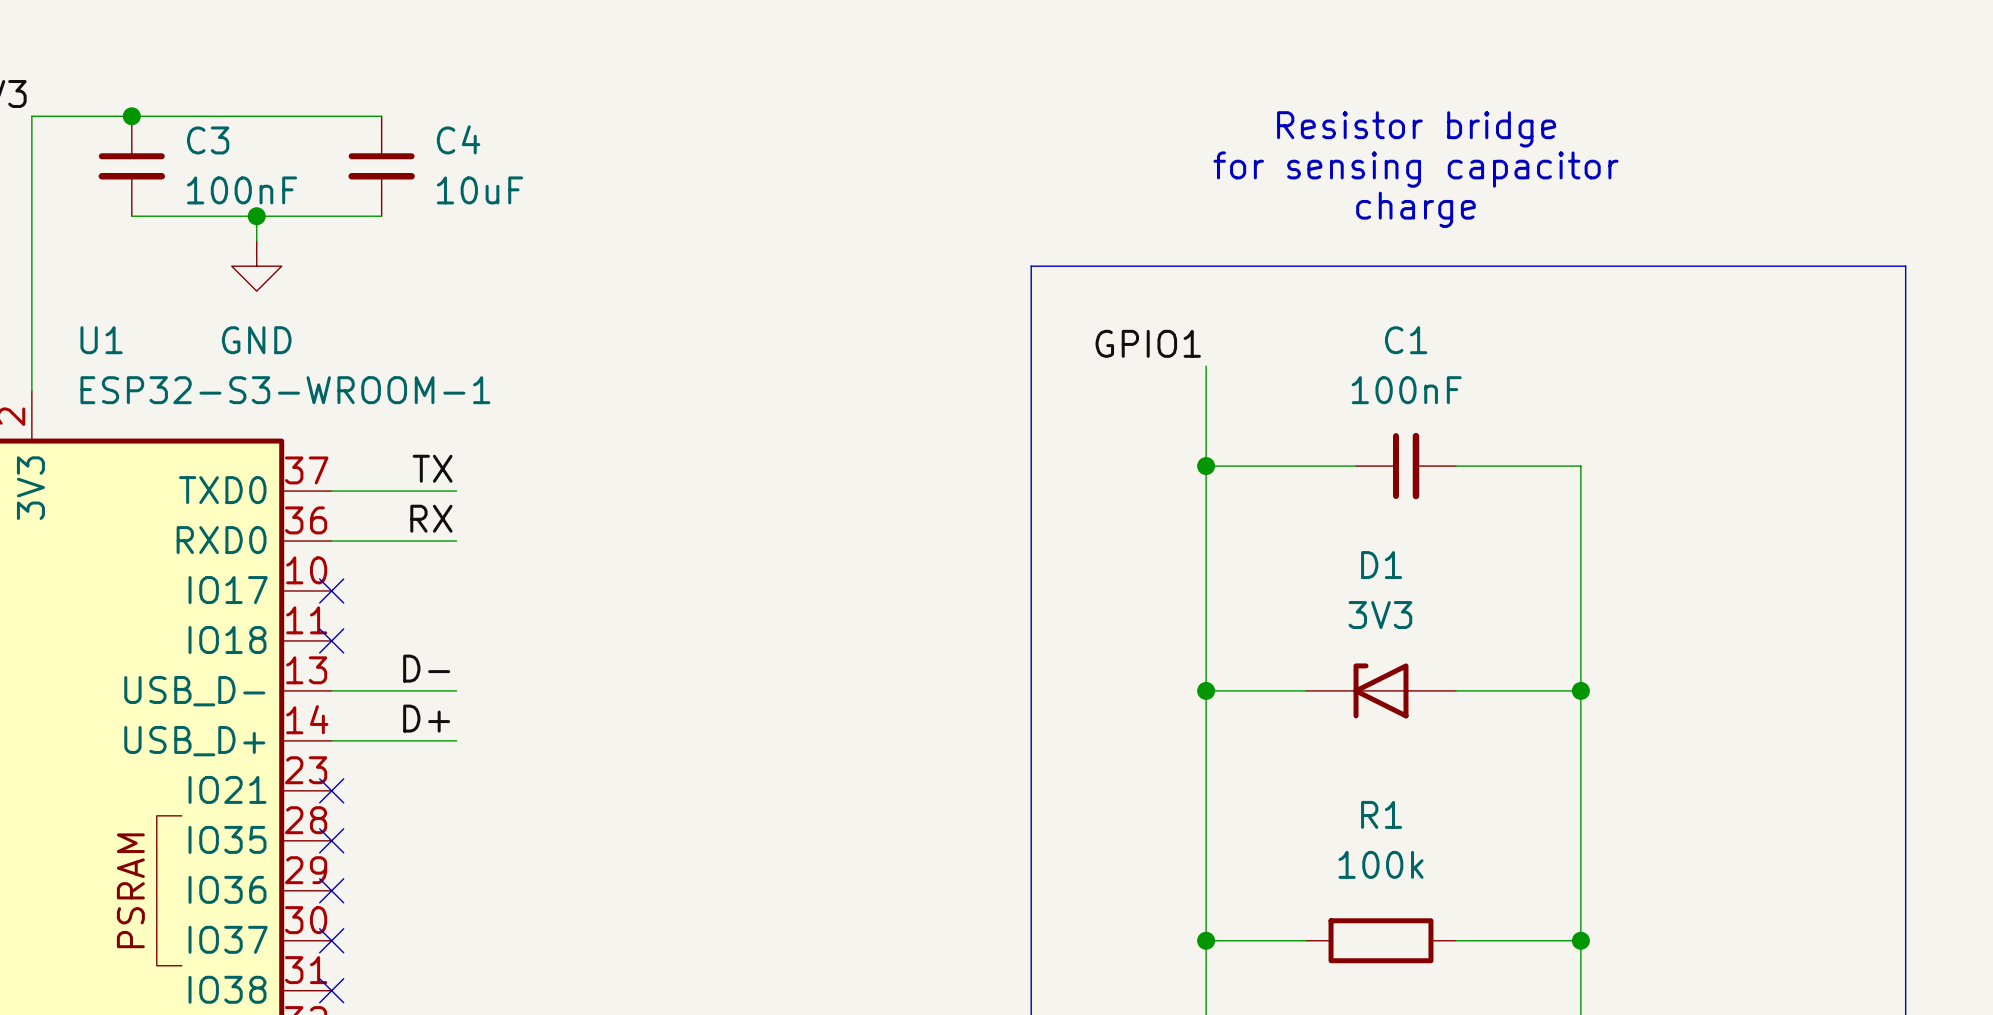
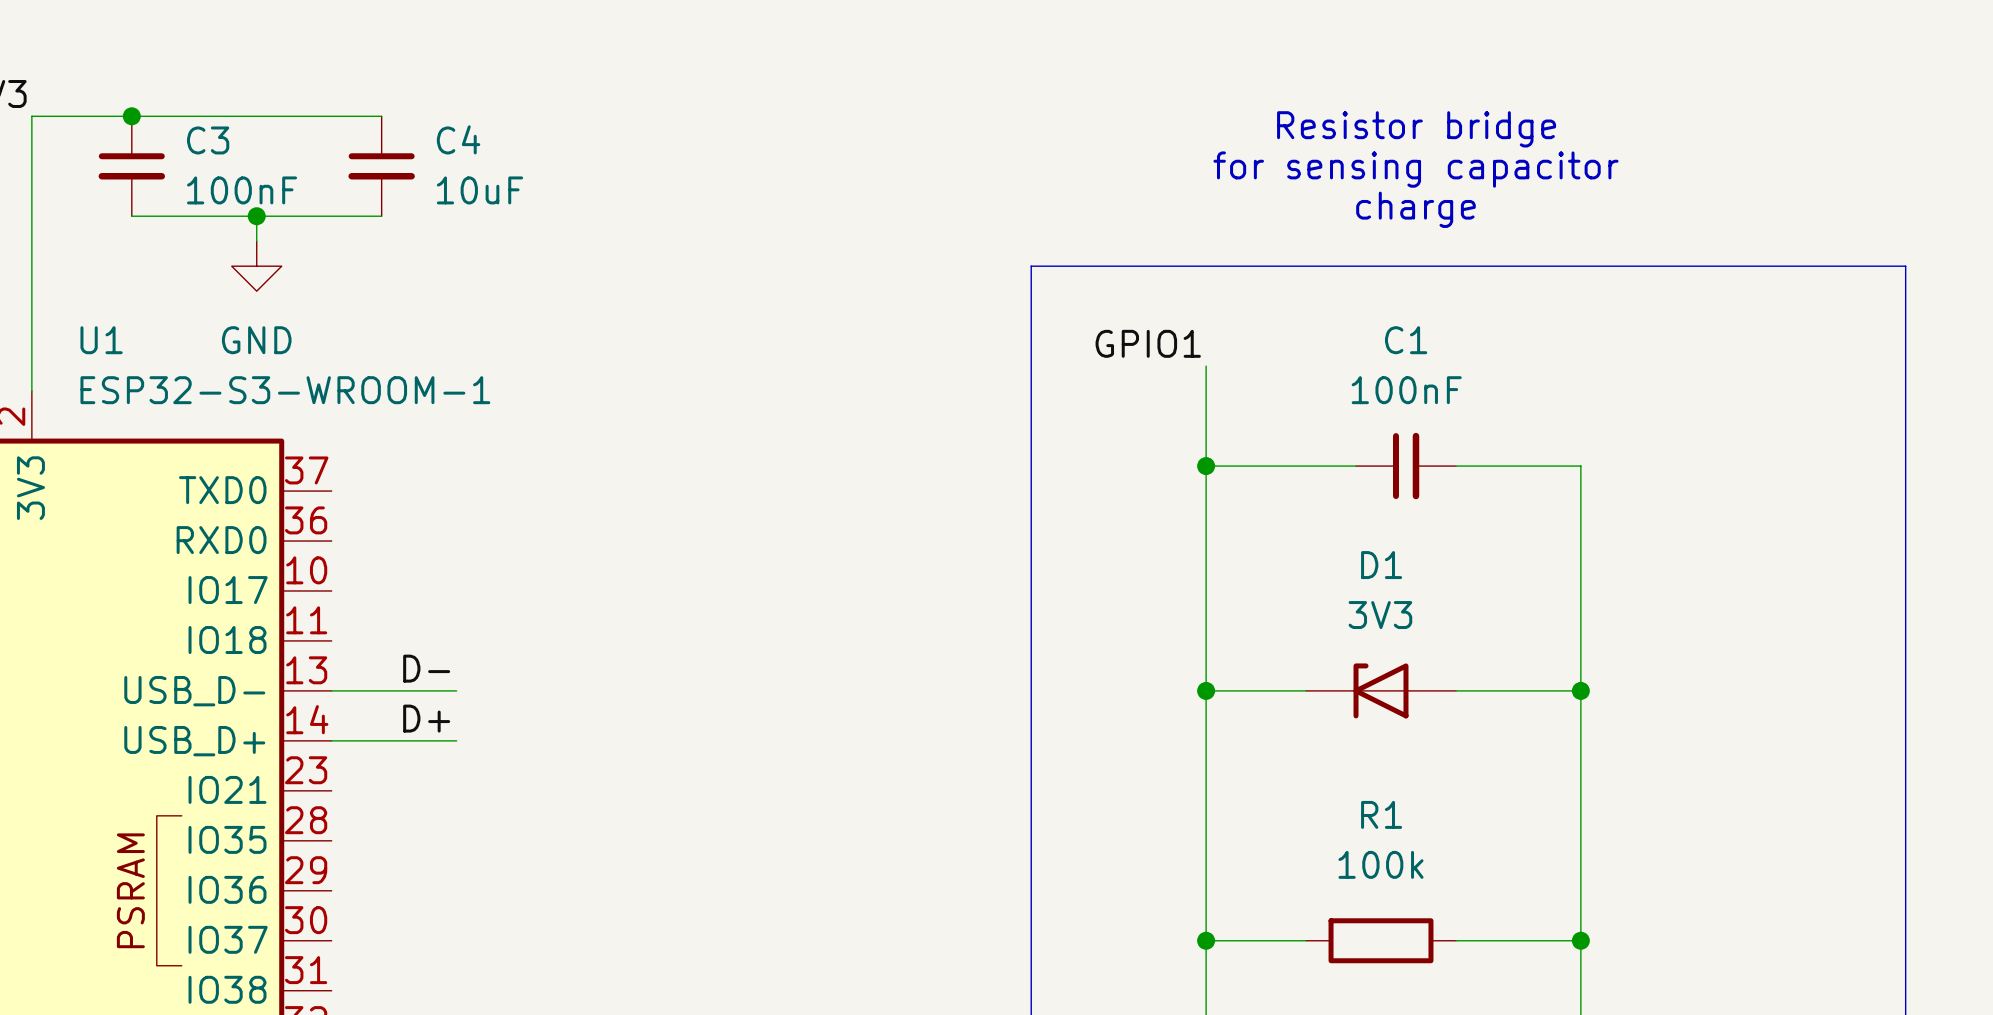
label: TX (432, 468) -> none
wire: (331, 491) (456, 491) -> none
label: RX (431, 518) -> none
wire: (331, 541) (456, 541) -> none
no-connect mark: (331, 590) -> none
no-connect mark: (331, 640) -> none
no-connect mark: (331, 790) -> none
no-connect mark: (331, 840) -> none
no-connect mark: (331, 890) -> none
no-connect mark: (331, 940) -> none
no-connect mark: (331, 990) -> none

